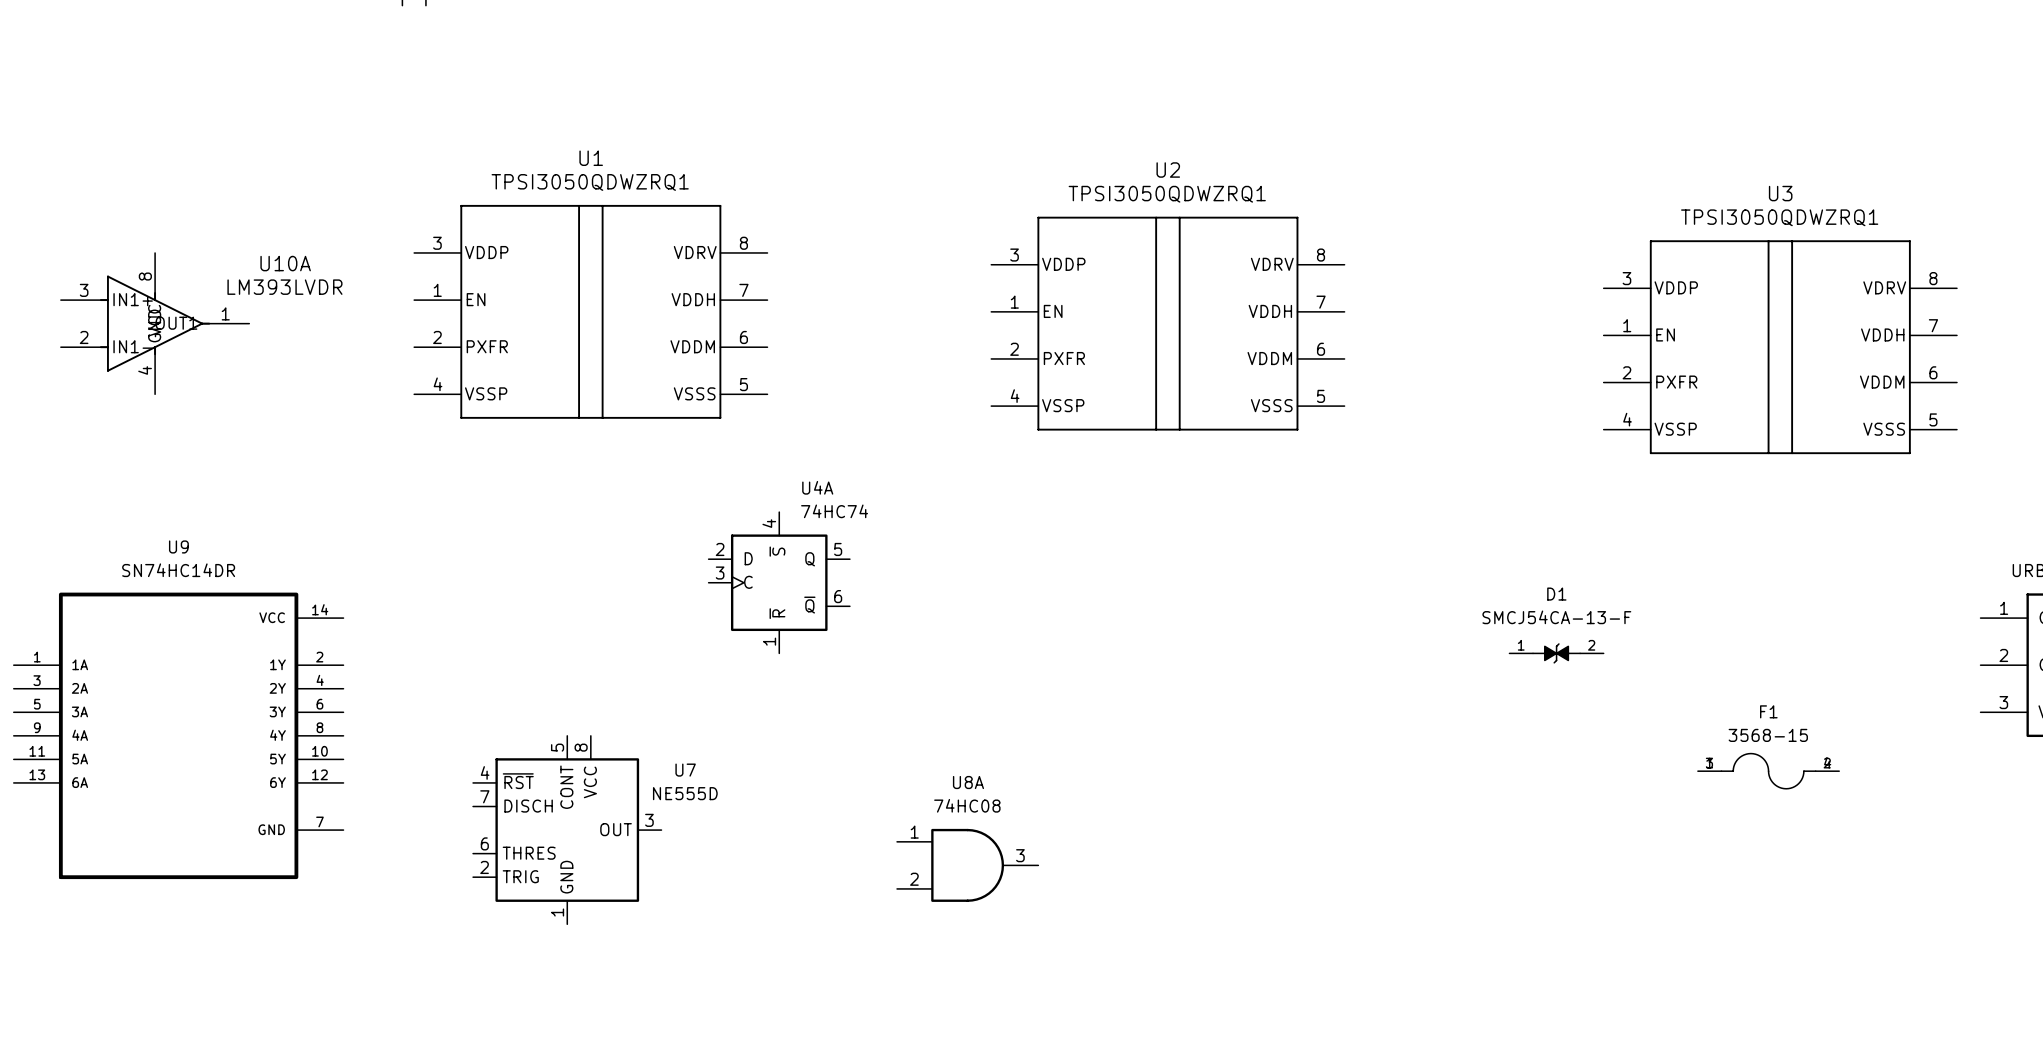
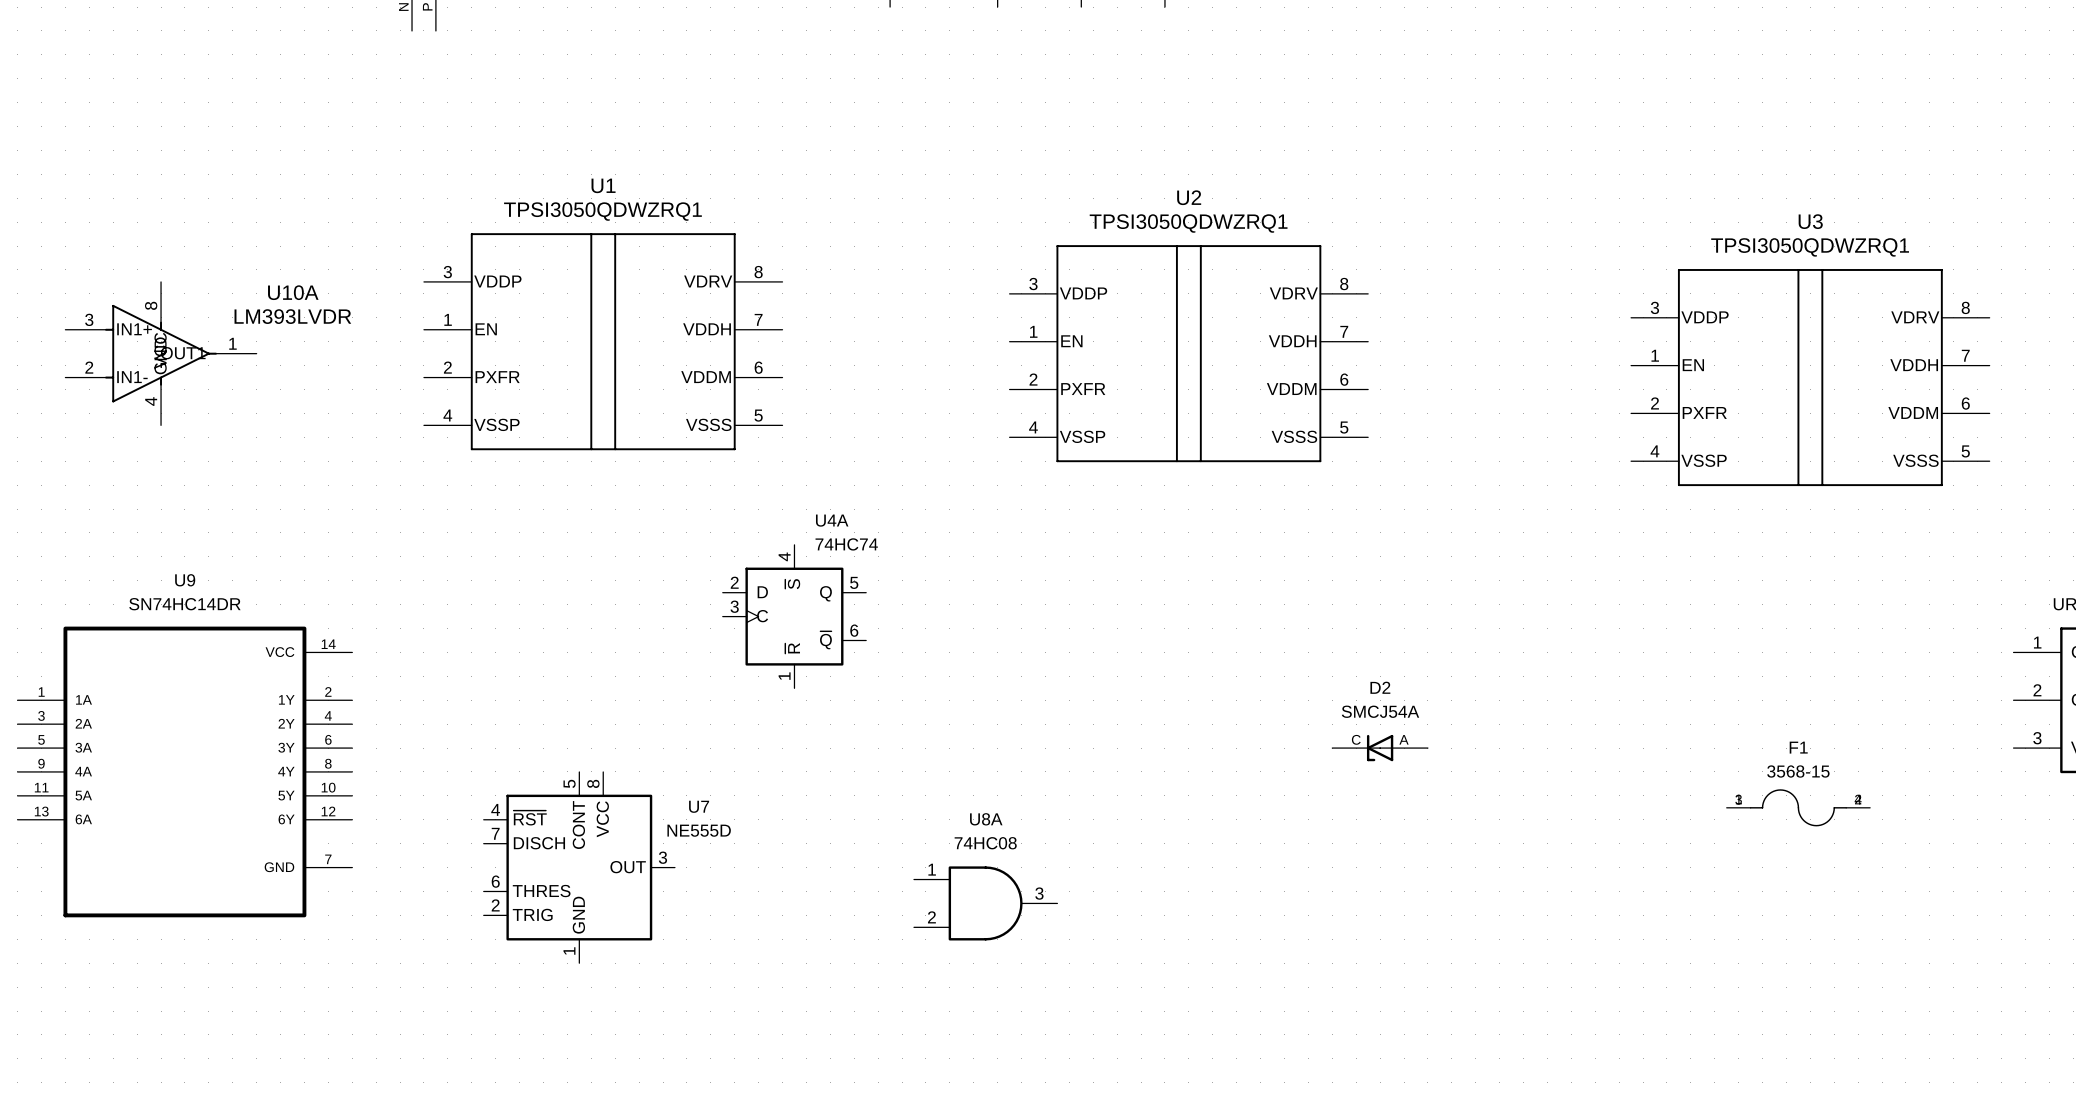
D1: SMCJ54CA-13-F (1556, 653) -> none
D2: none -> SMCJ54A (1380, 748)

